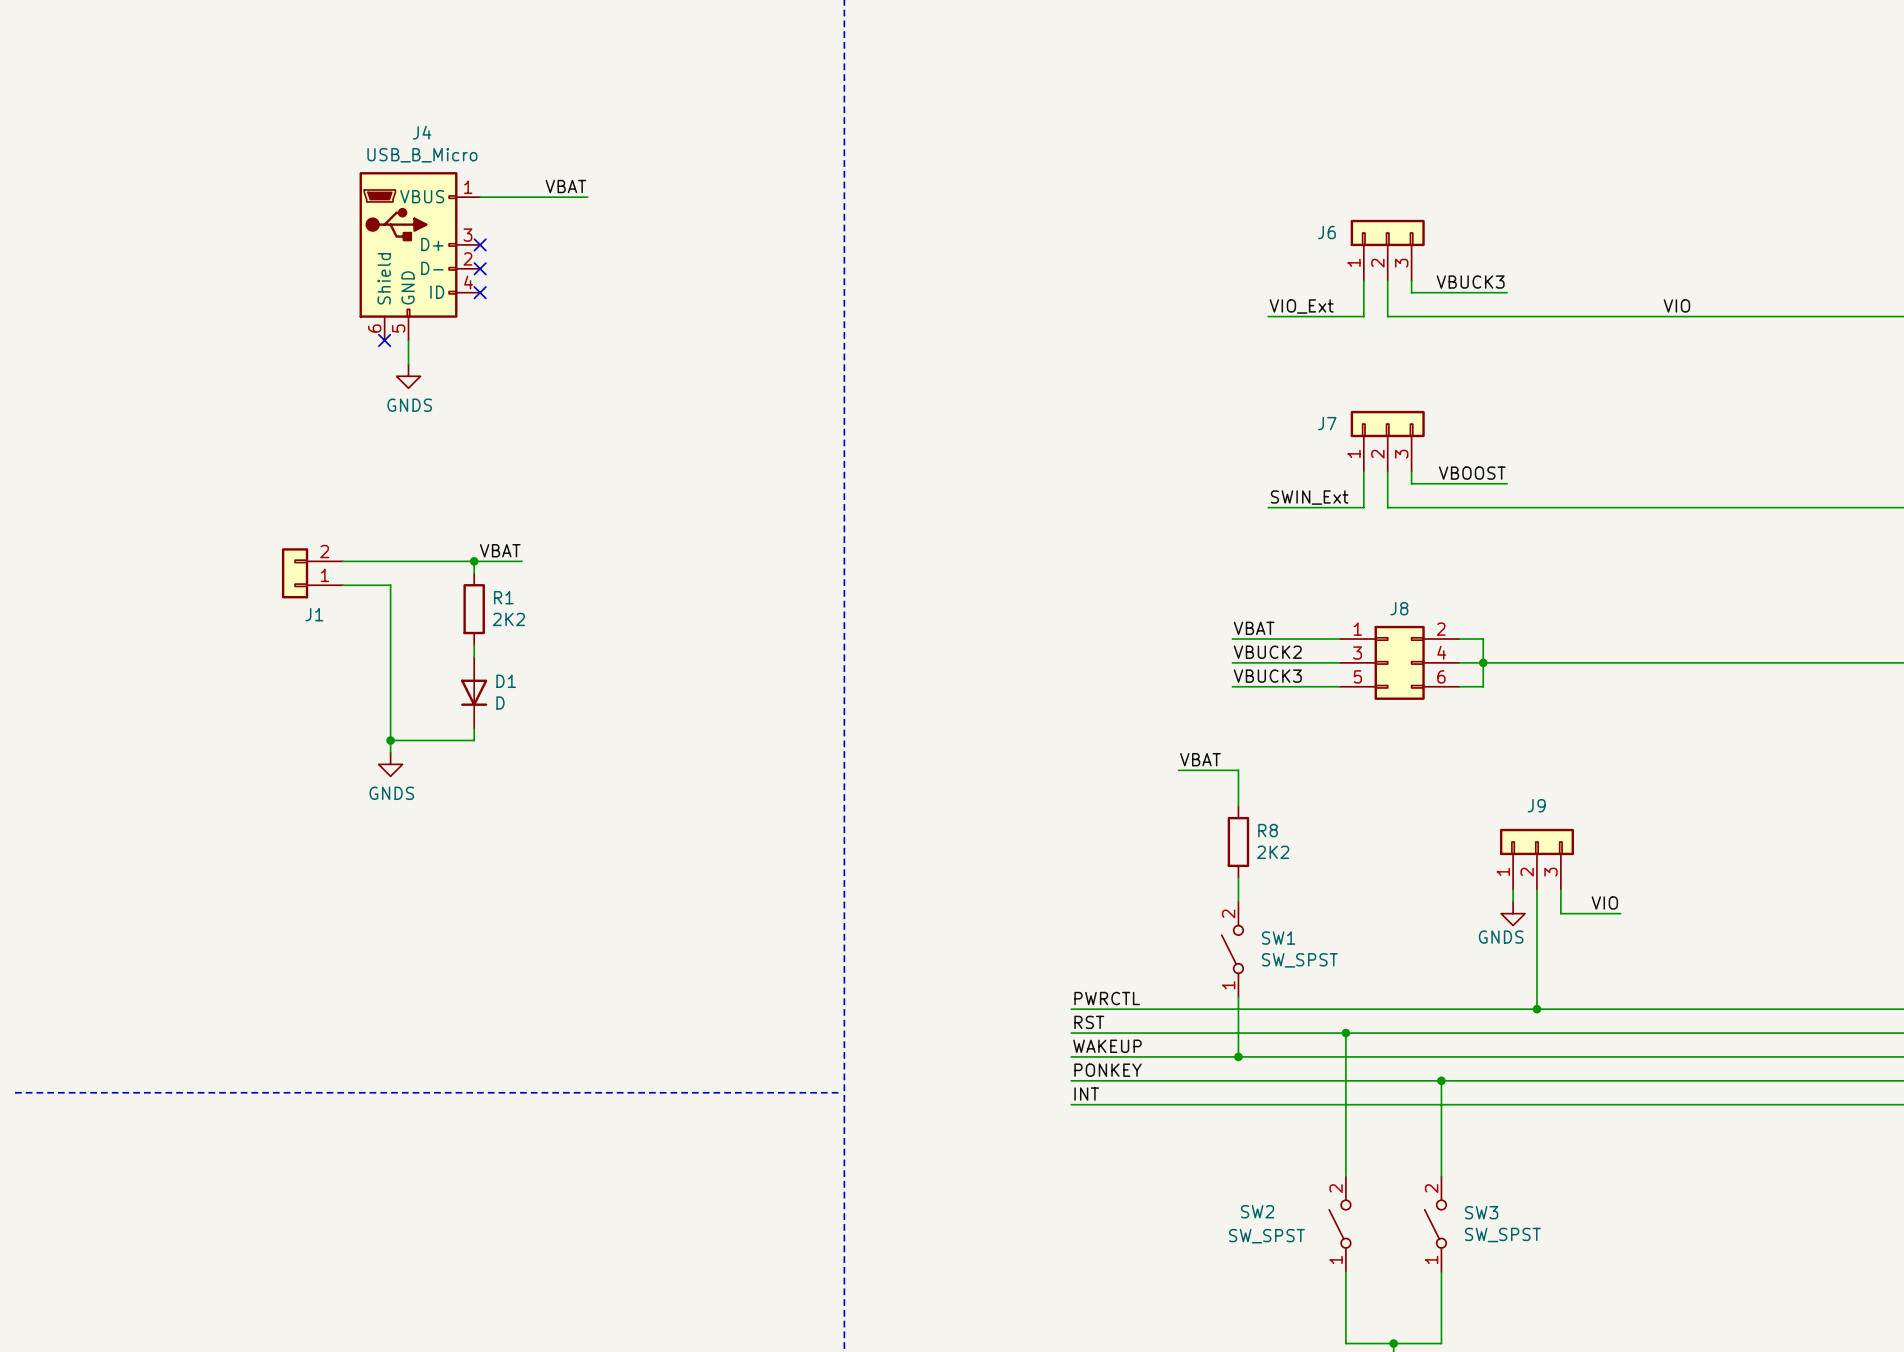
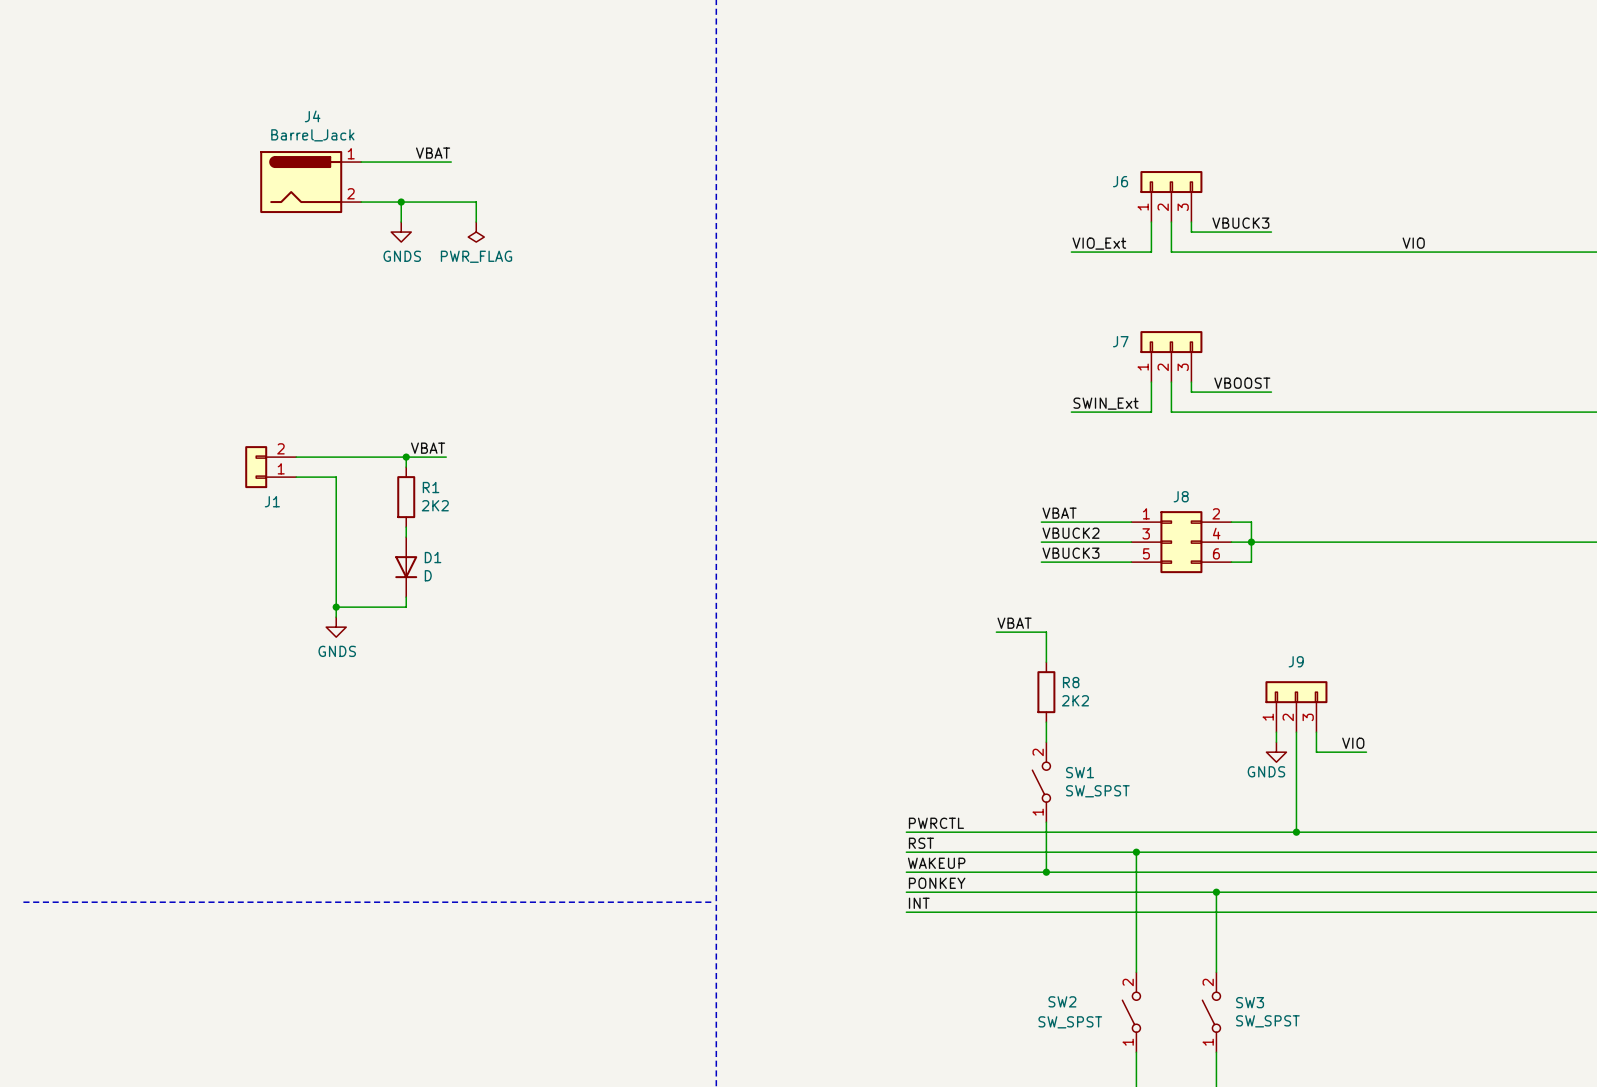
J4 name position: J4 (422, 132) -> J4 (312, 116)
J4 value: USB_B_Micro (422, 155) -> Barrel_Jack (312, 135)
J4 symbol: [359, 172, 481, 341] -> [260, 151, 362, 214]
label position: VBAT (565, 186) -> VBAT (433, 153)
wire: (480, 197) (587, 197) -> (361, 162) (451, 162)
no-connect mark: (480, 244) -> none
wire: none -> (361, 202) (476, 202) (476, 222)
junction: none -> (401, 202)
no-connect mark: (480, 268) -> none
no-connect mark: (480, 292) -> none
power symbol: none -> PWR_FLAG (476, 232)
no-connect mark: (384, 340) -> none
wire: (408, 340) (408, 364) -> (401, 202) (401, 222)
power symbol position: GNDS (408, 376) -> GNDS (401, 232)

